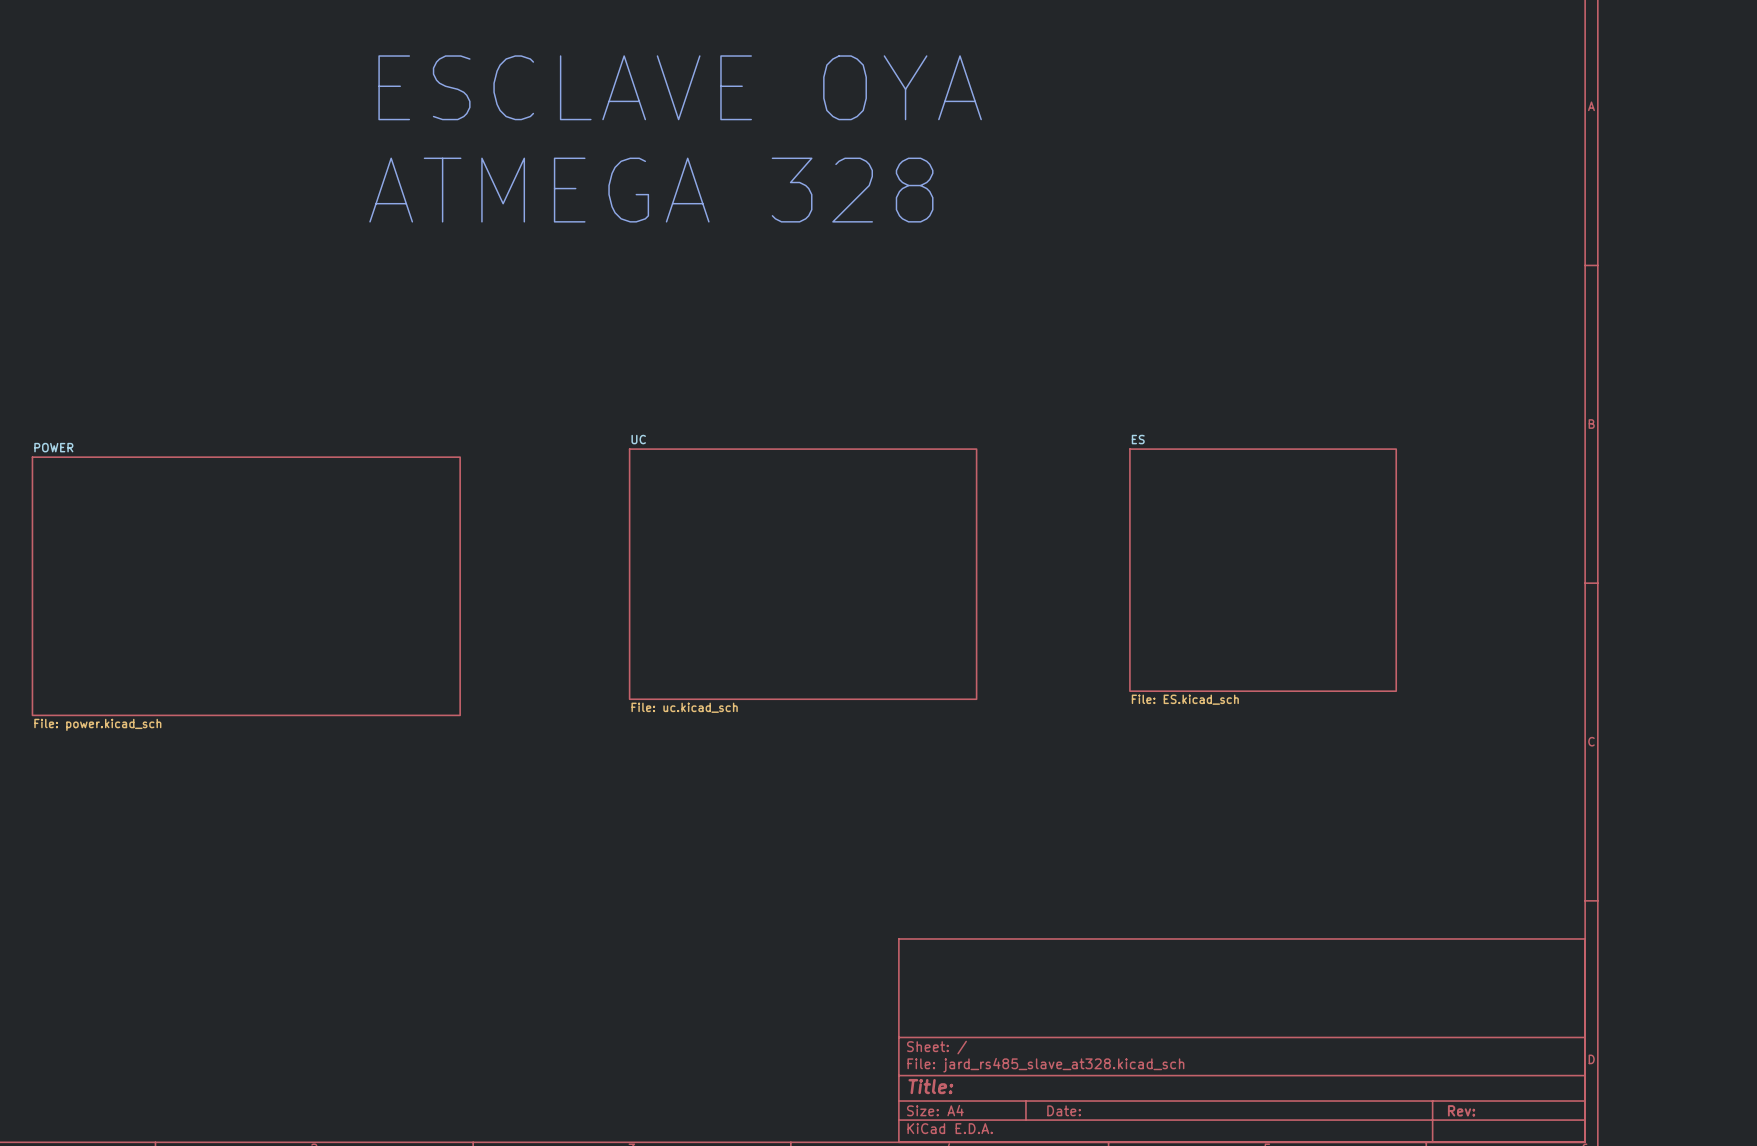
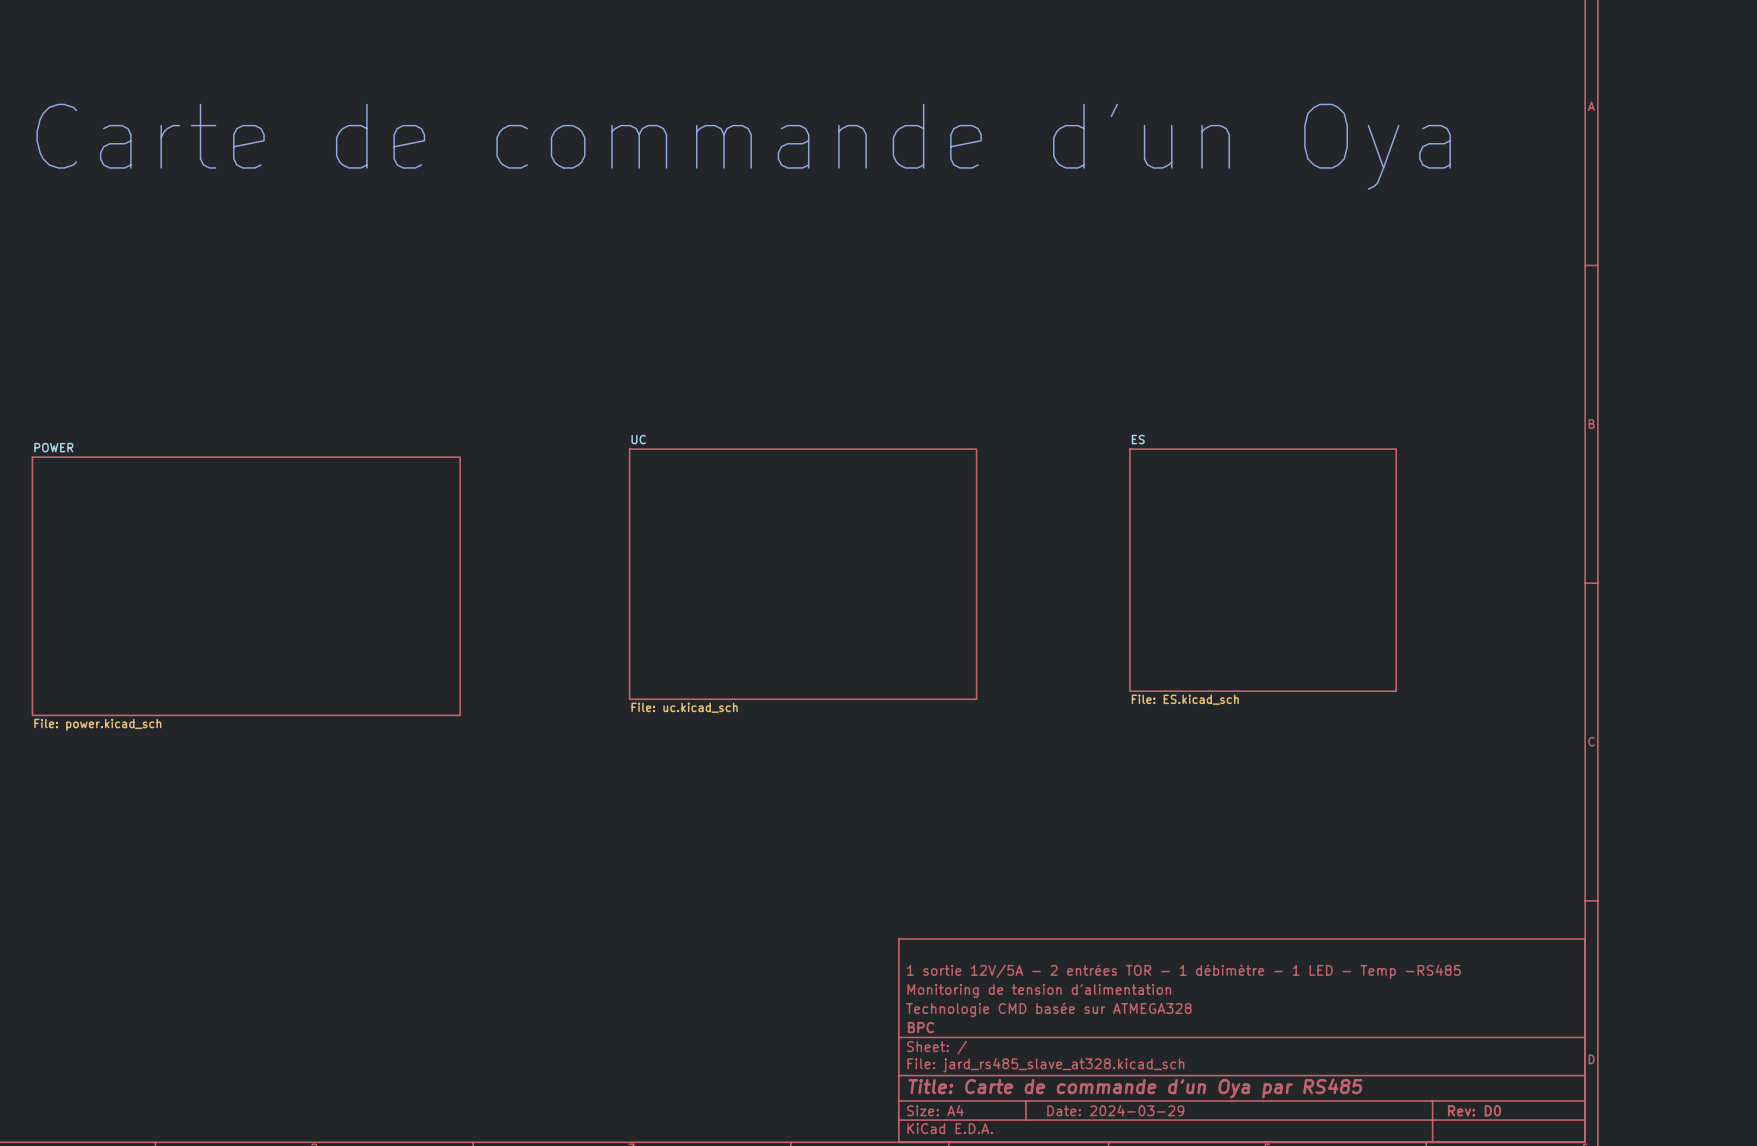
text: ESCLAVE OYA (680, 87) -> none
text: none -> Carte de commande d'un Oya (743, 146)
text: ATMEGA 328 (651, 190) -> none
title block: none -> 1 sortie 12V/5A - 2 entrées TOR - 1 débimètre - 1 LED - Temp -RS485 (1183, 971)
title block: none -> Monitoring de tension d'alimentation (1039, 991)
title block: none -> Technologie CMD basée sur ATMEGA328 (1048, 1009)
title block: none -> BPC (921, 1027)
title block: Title: (930, 1086) -> Title: Carte de commande d'un Oya par RS485 (1135, 1088)
title block: Date: (1064, 1110) -> Date: 2024-03-29 (1115, 1110)
title block: Rev: (1461, 1110) -> Rev: D0 (1474, 1110)

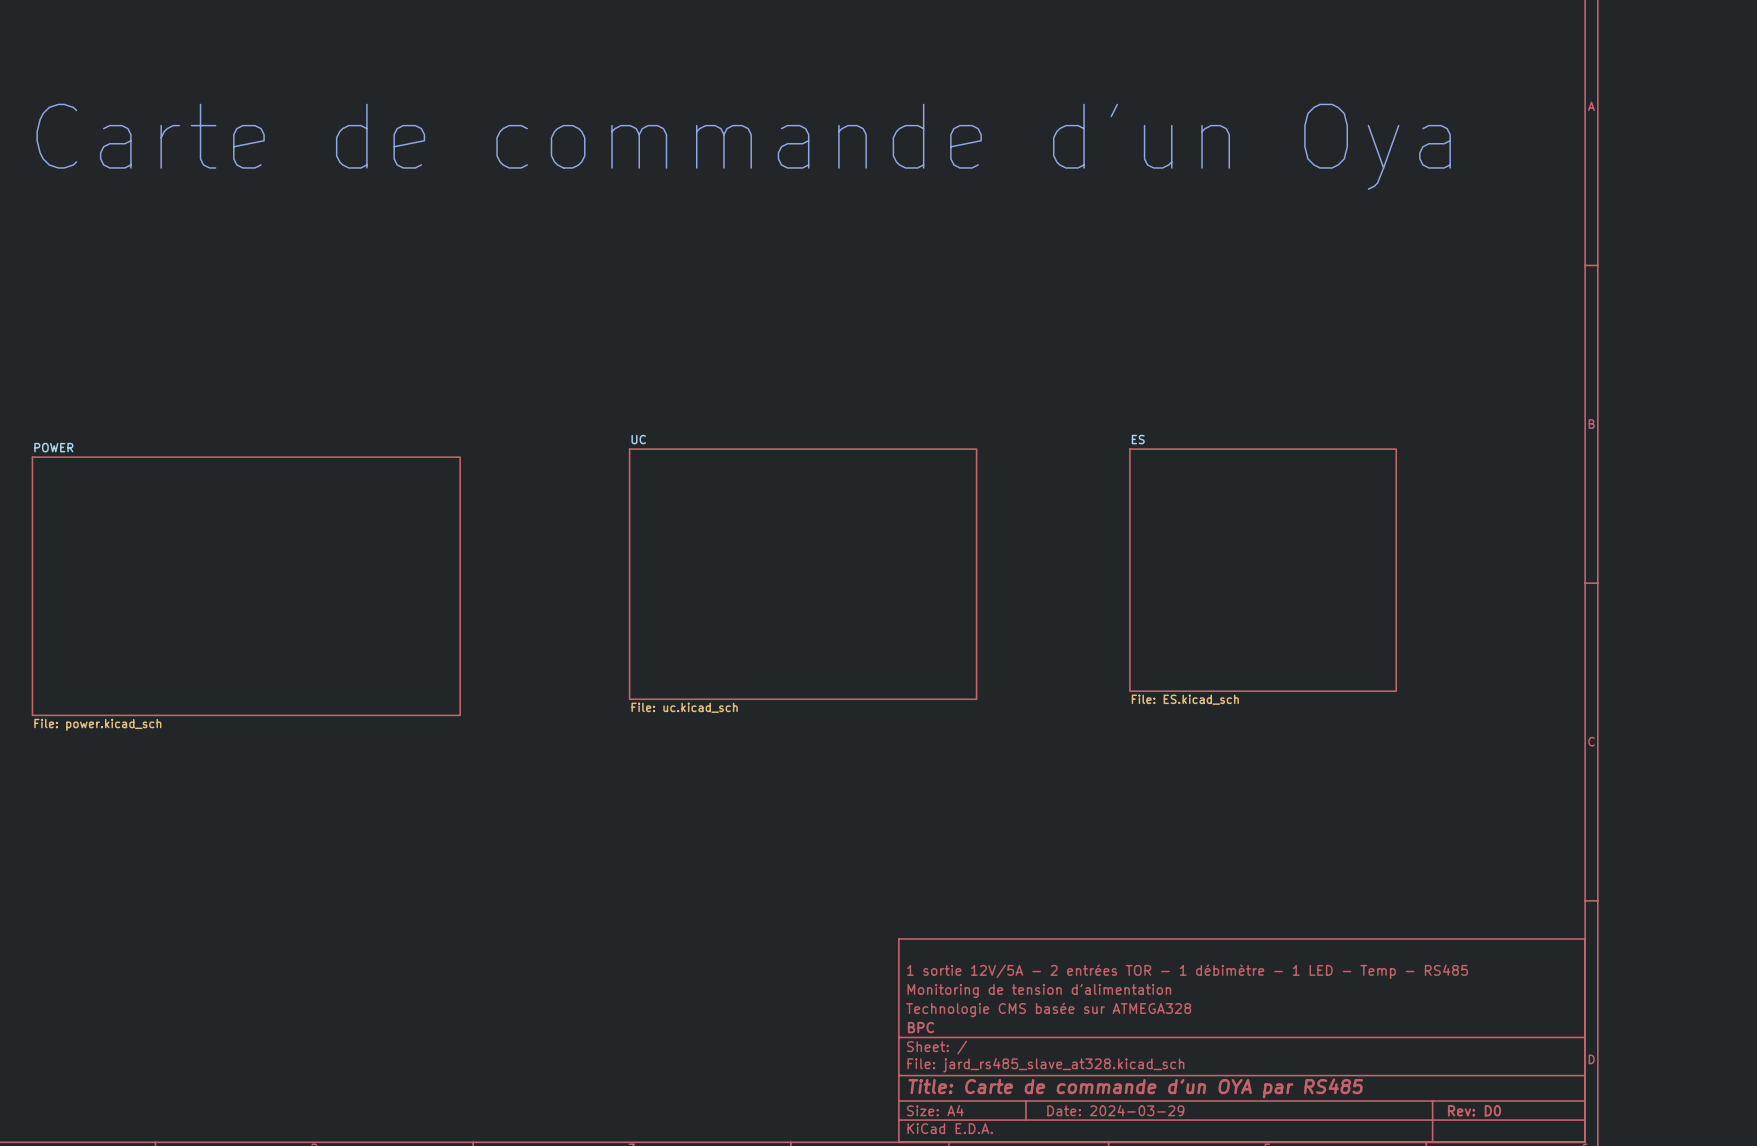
title block: 1 sortie 12V/5A - 2 entrées TOR - 1 débimètre - 1 LED - Temp -RS485 (1183, 971) -> 1 sortie 12V/5A - 2 entrées TOR - 1 débimètre - 1 LED - Temp - RS485 (1187, 971)
title block: Technologie CMD basée sur ATMEGA328 (1048, 1009) -> Technologie CMS basée sur ATMEGA328 (1048, 1009)
title block: Title: Carte de commande d'un Oya par RS485 (1135, 1088) -> Title: Carte de commande d'un OYA par RS485 (1135, 1088)

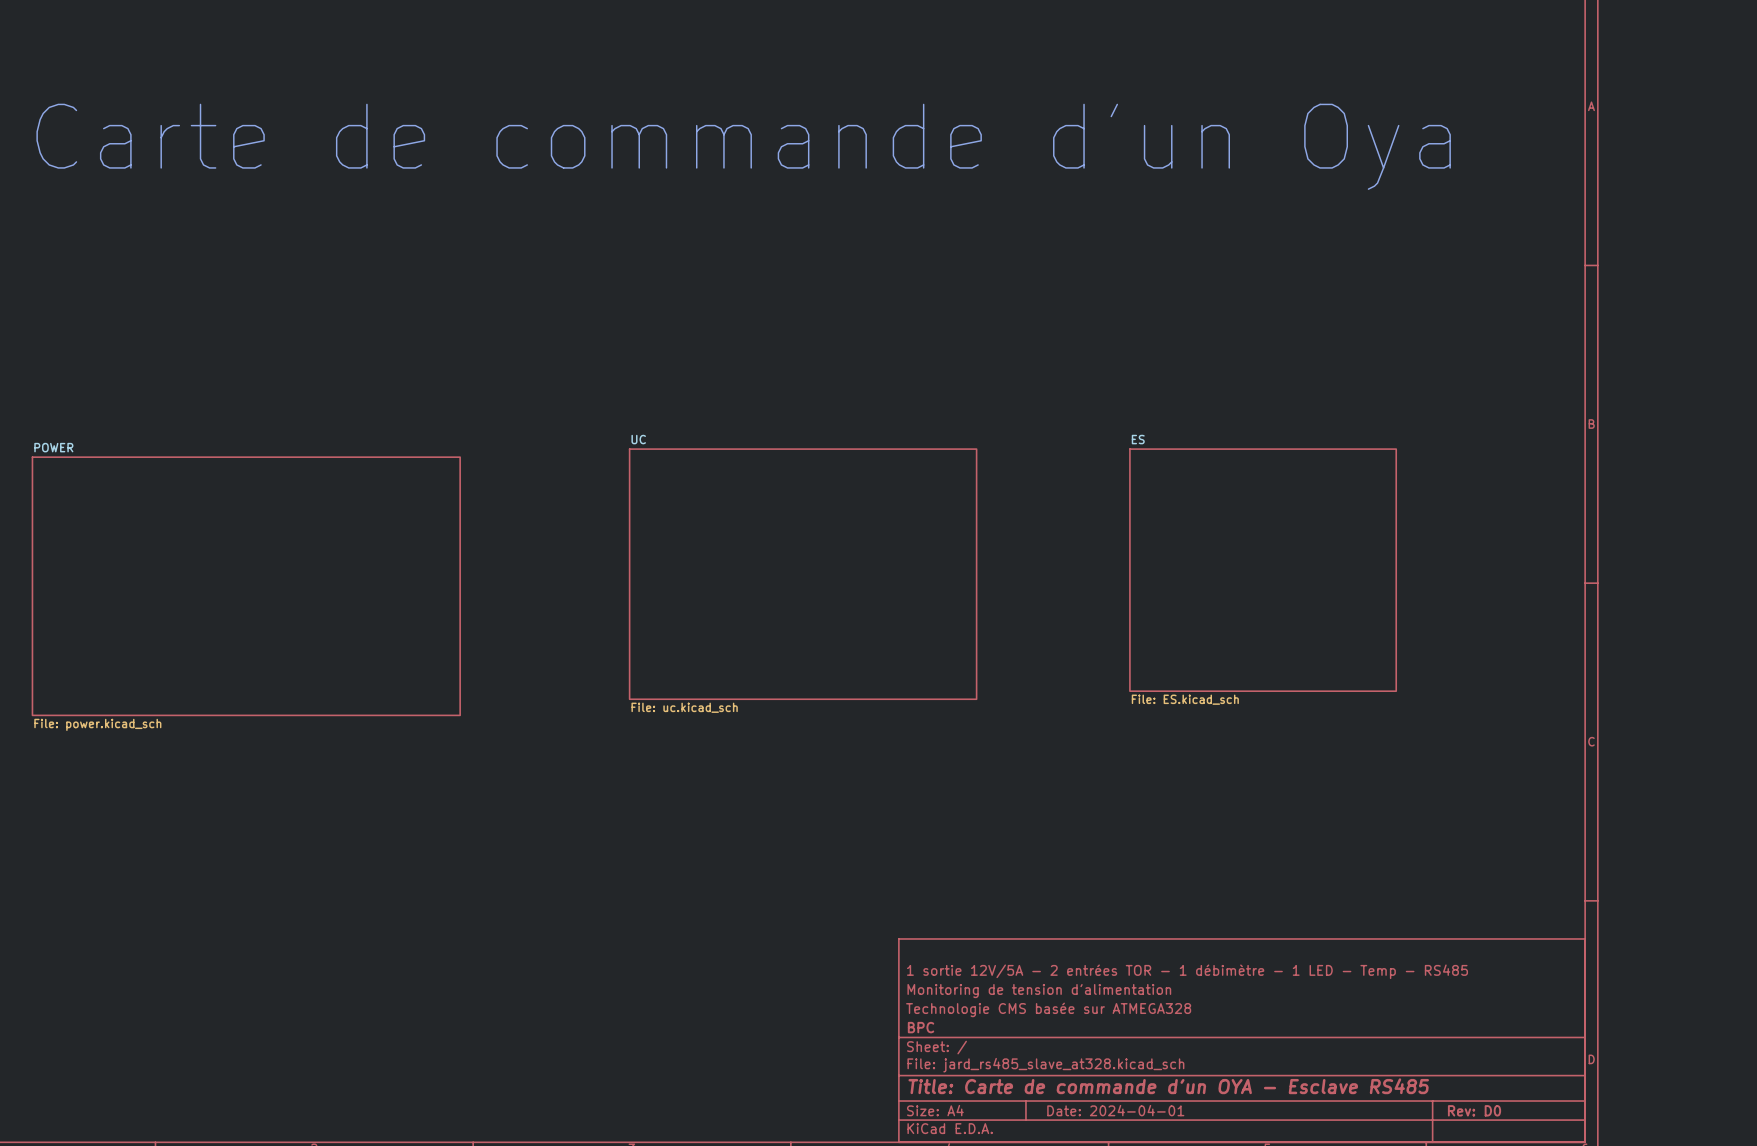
title block: Title: Carte de commande d'un OYA par RS485 (1135, 1088) -> Title: Carte de commande d'un OYA - Esclave RS485 (1168, 1086)
title block: Date: 2024-03-29 (1115, 1110) -> Date: 2024-04-01 (1115, 1110)

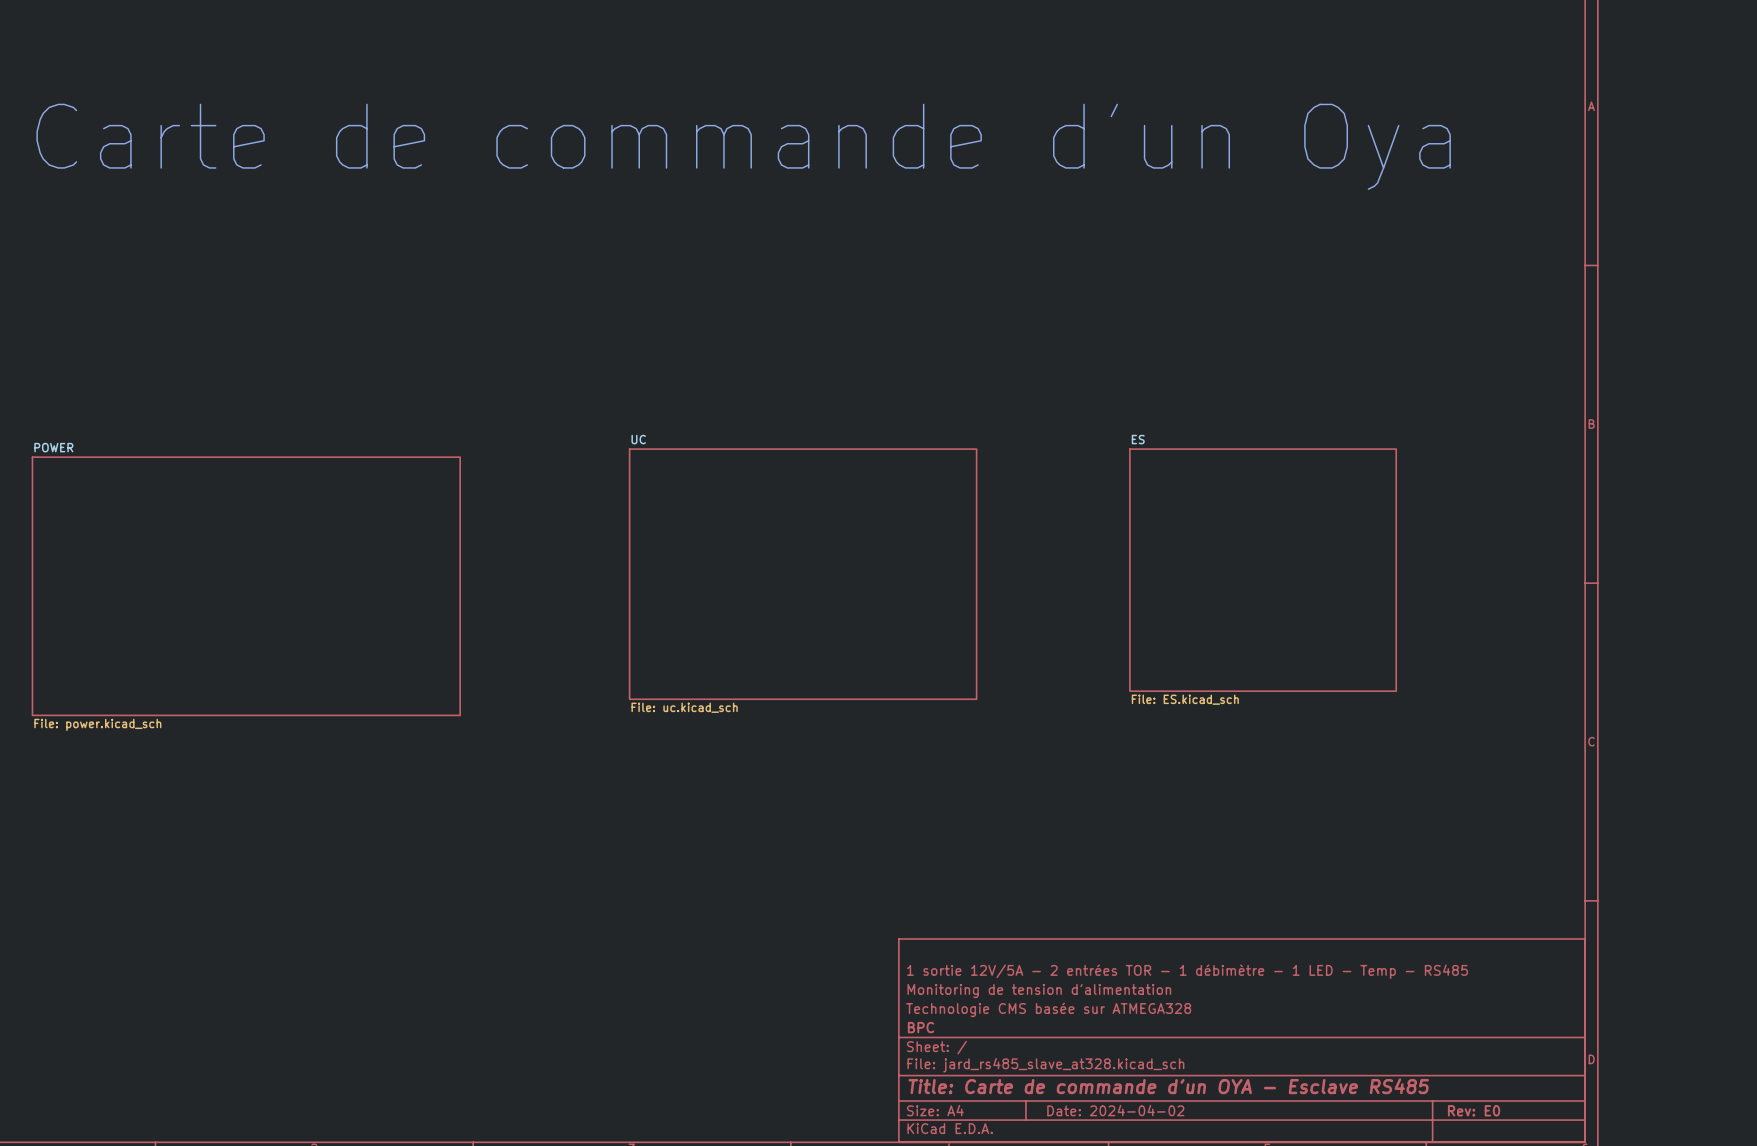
title block: Date: 2024-04-01 (1115, 1110) -> Date: 2024-04-02 (1115, 1110)
title block: Rev: D0 (1474, 1110) -> Rev: E0 (1474, 1110)

